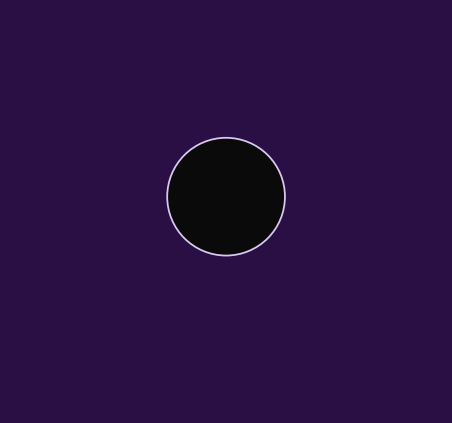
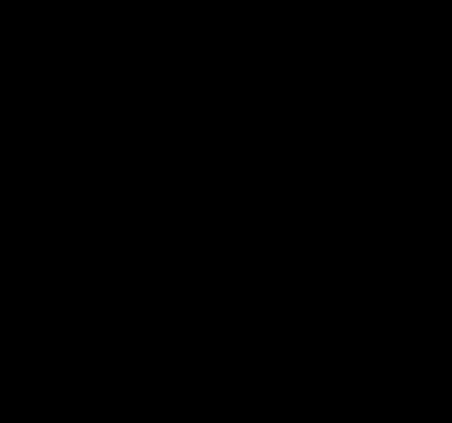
part: (226, 196) -> none

